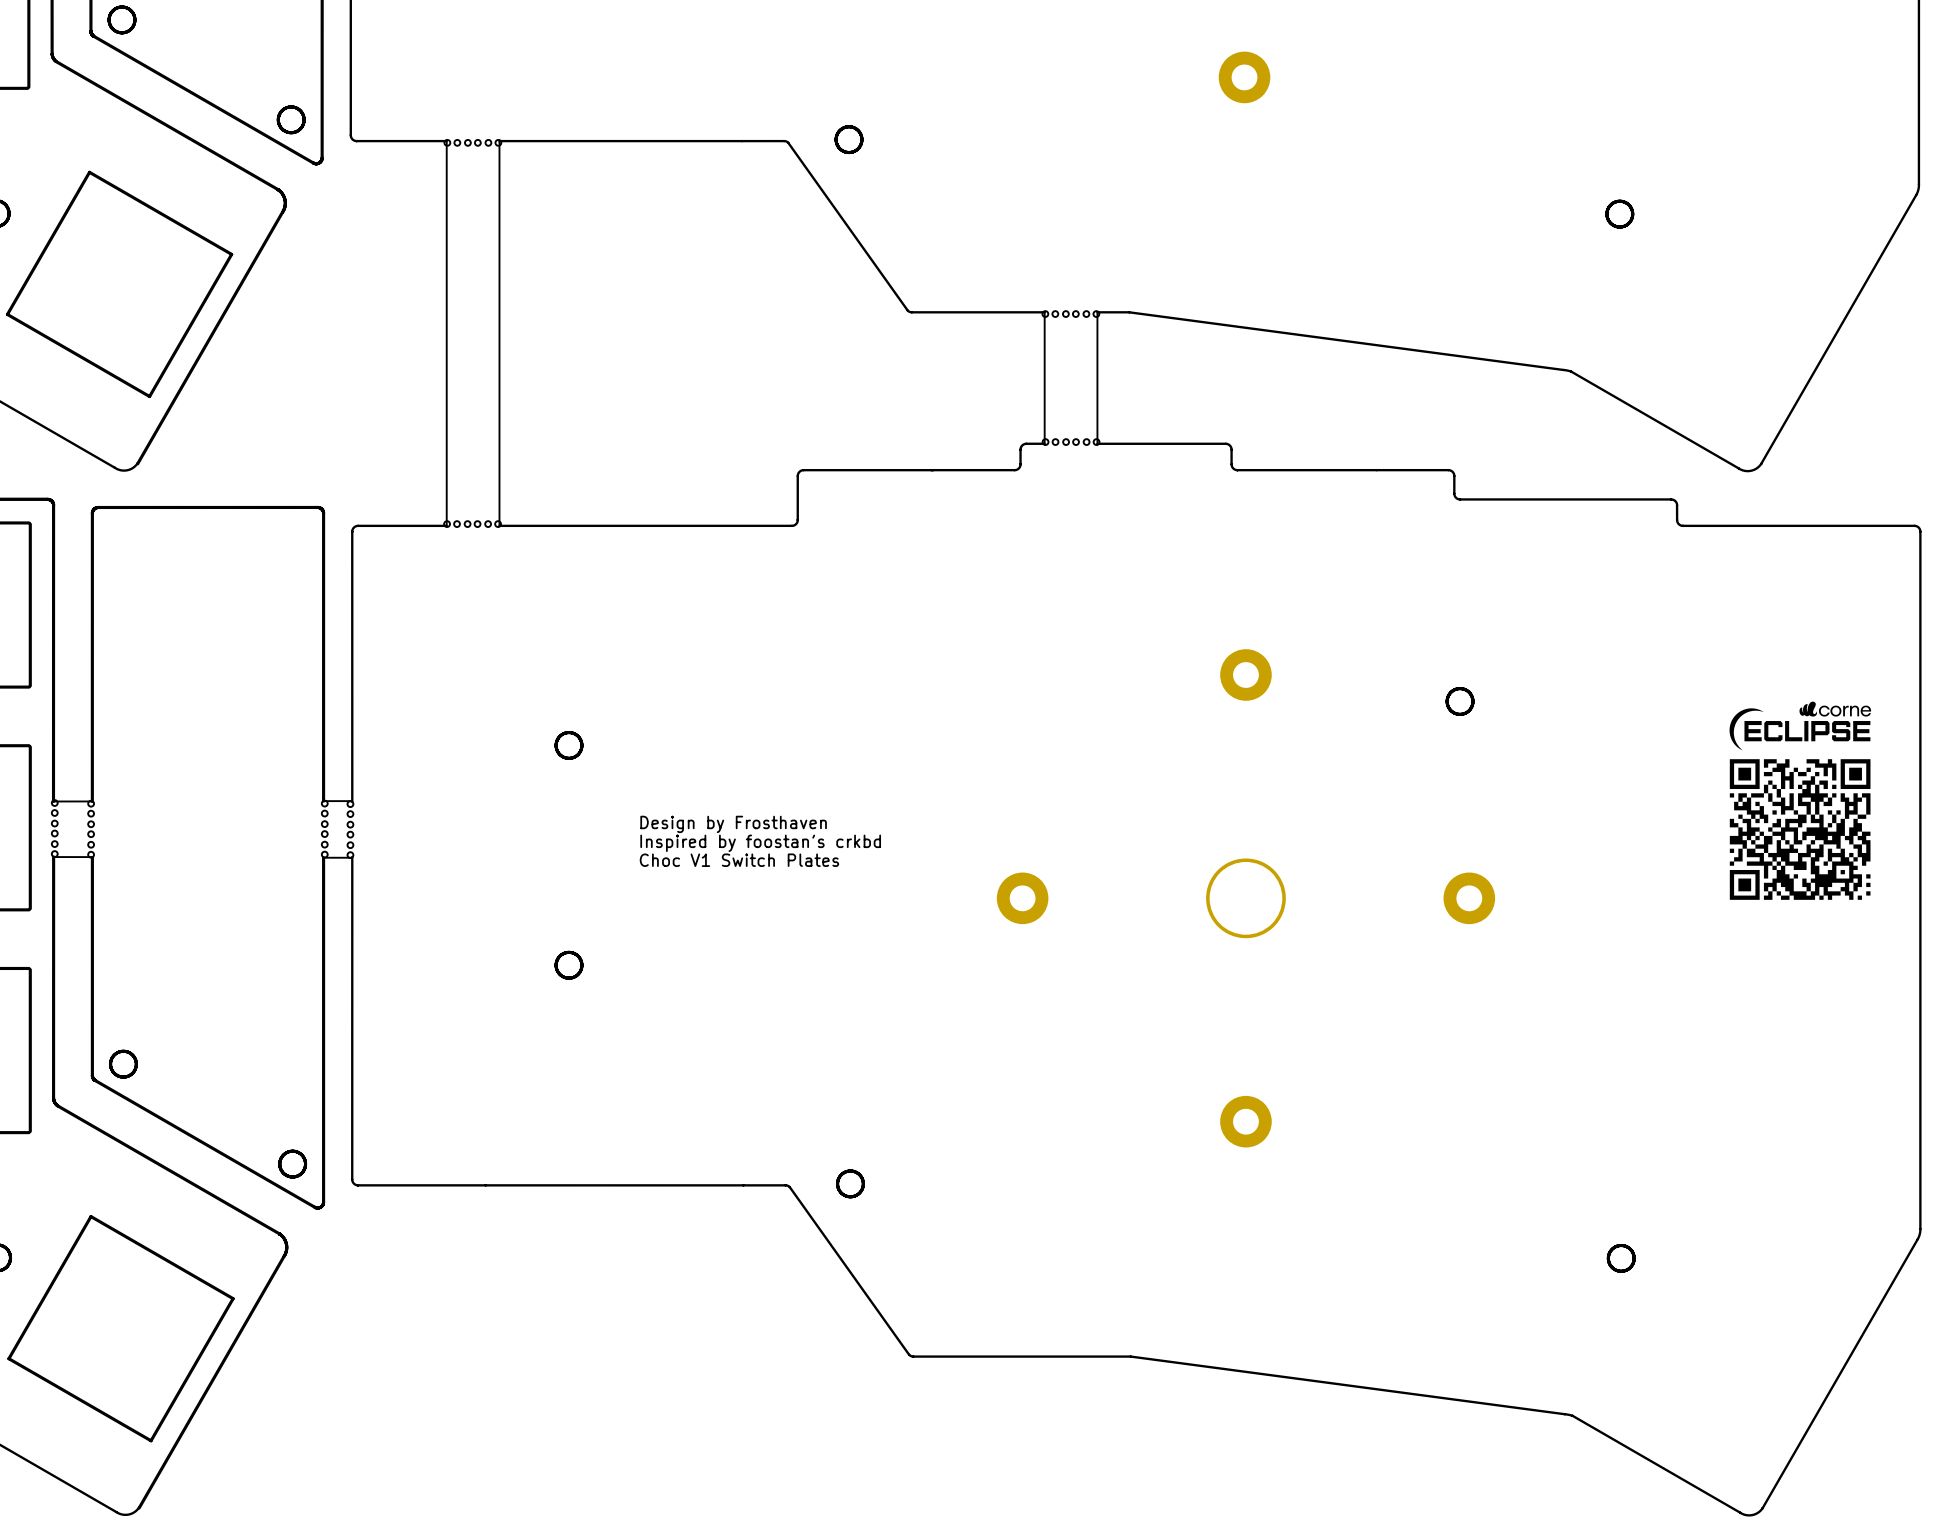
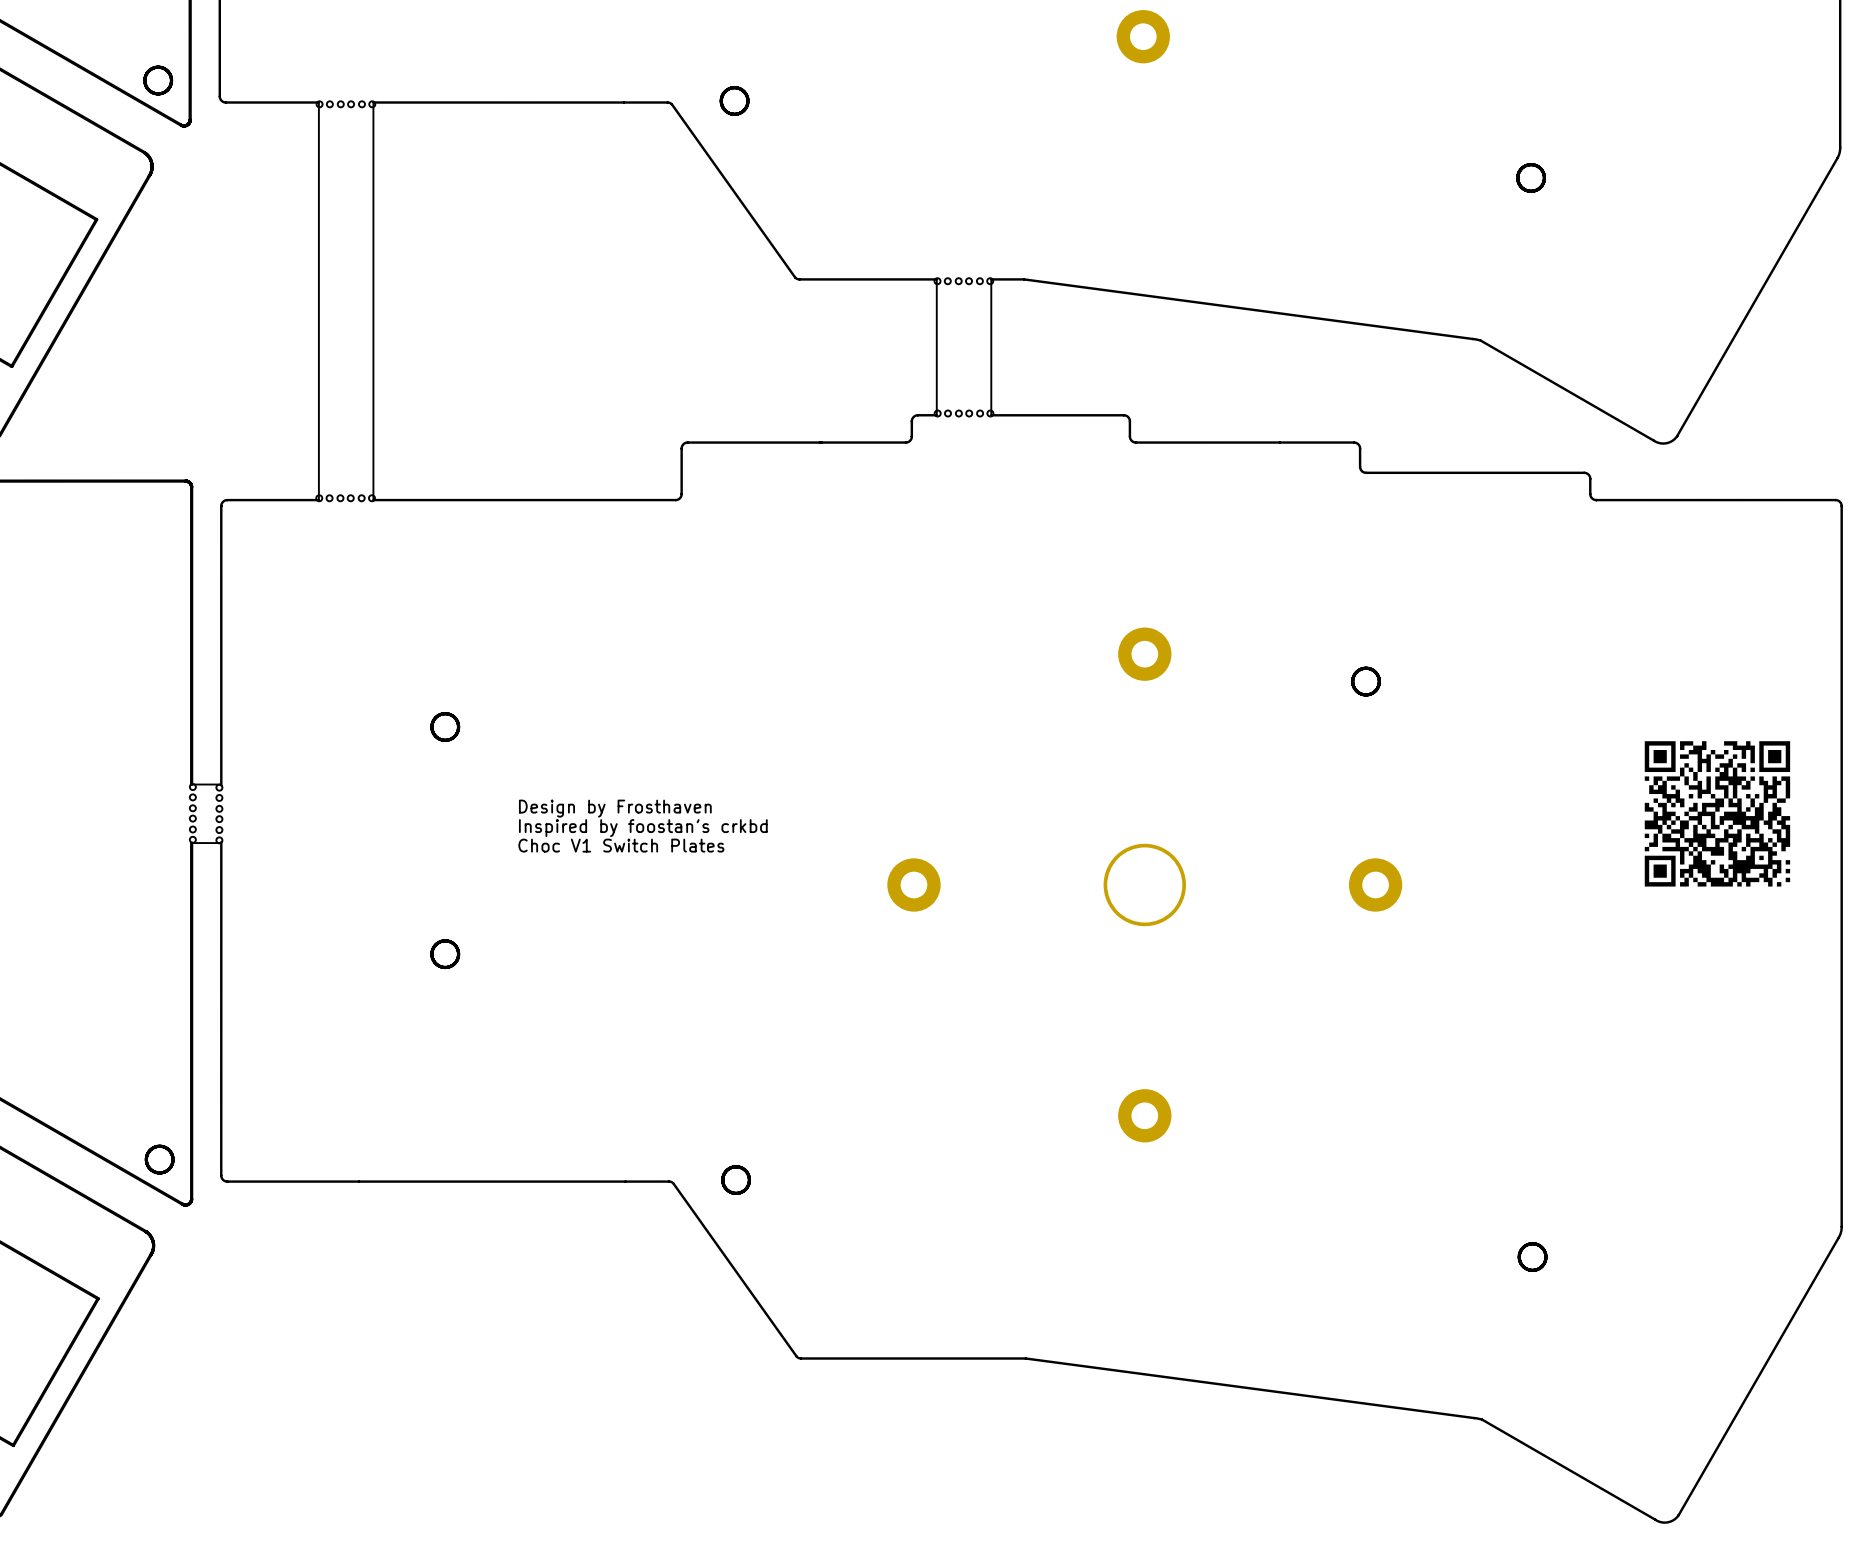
drawing: [1729, 701, 1872, 751] -> none

